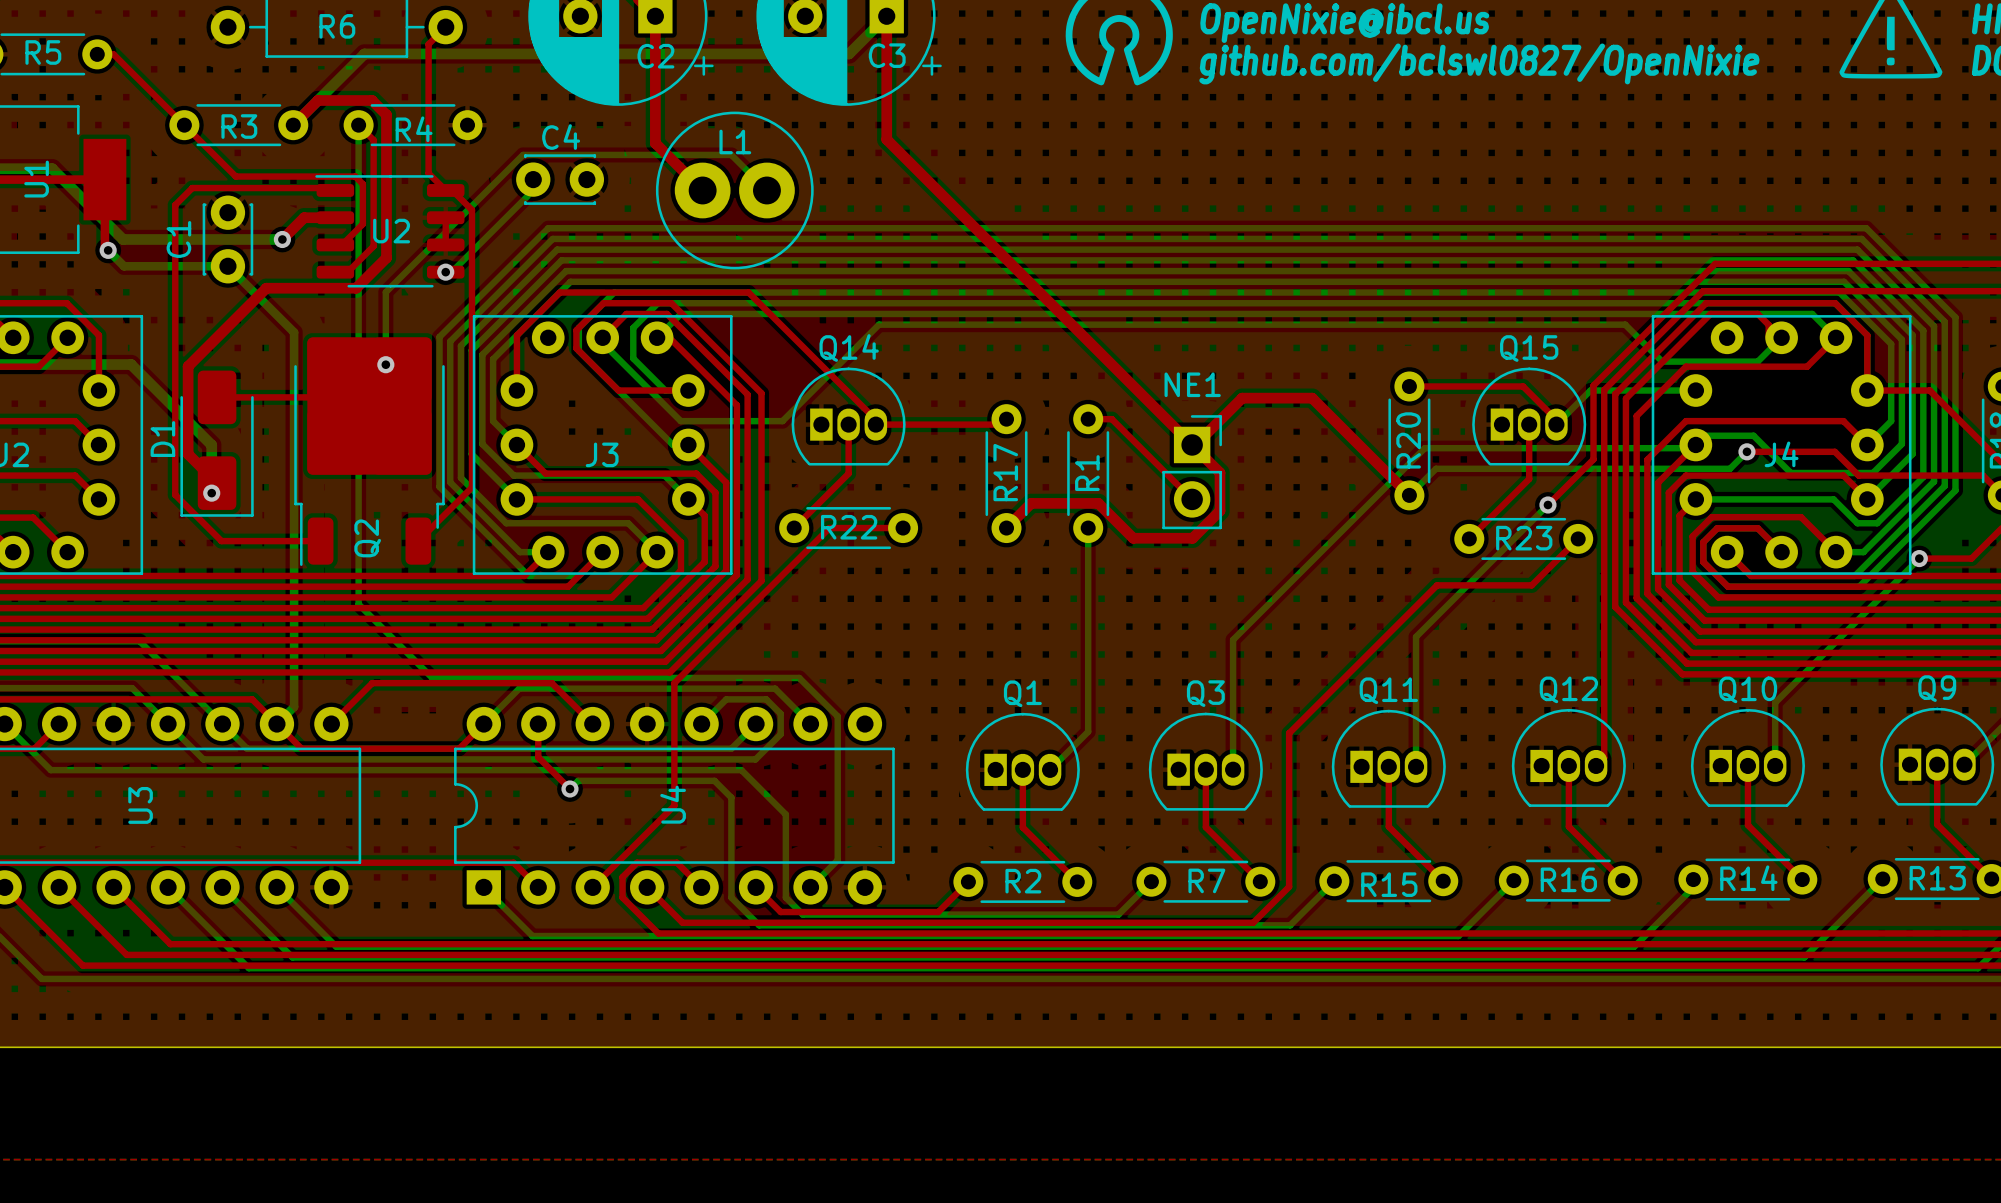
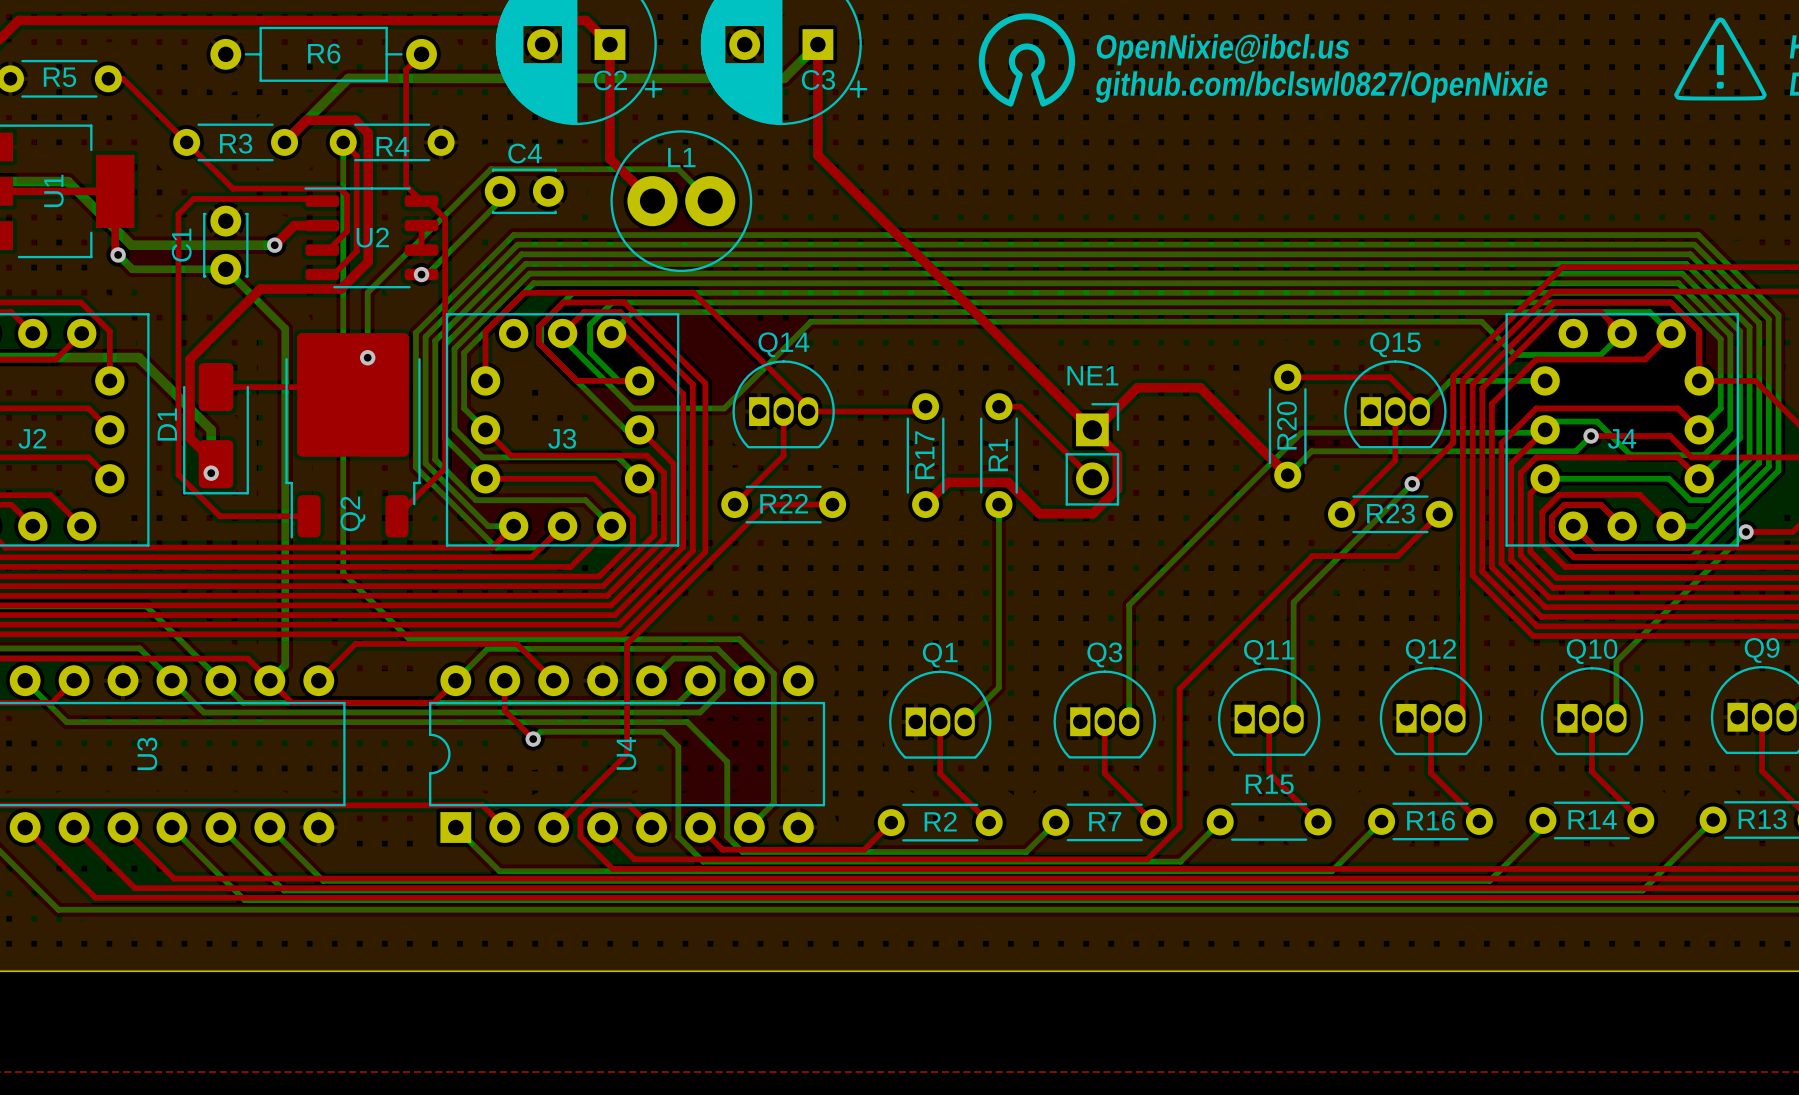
R15 name position: R15 (1389, 884) -> R15 (1269, 784)

